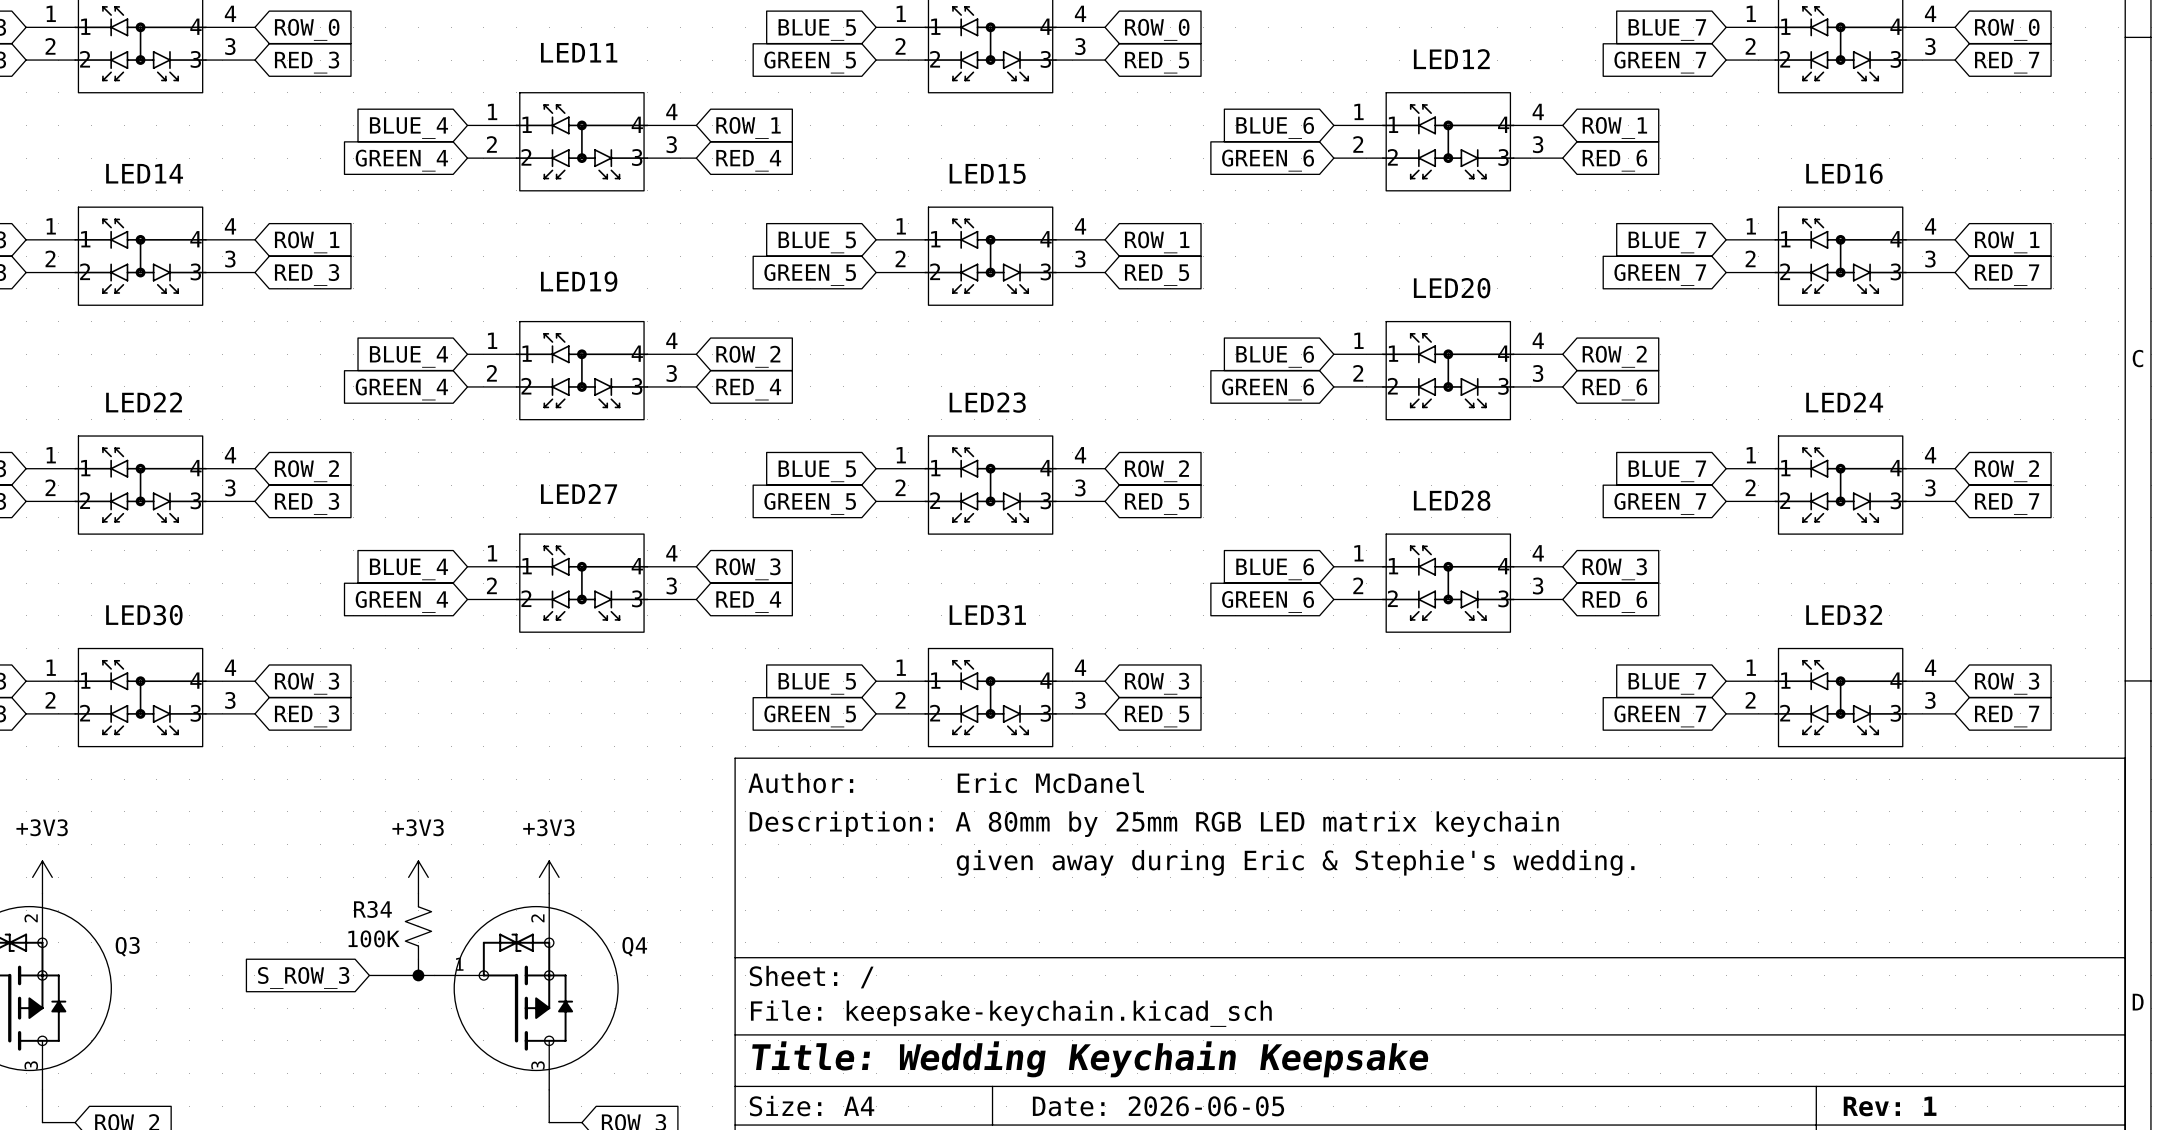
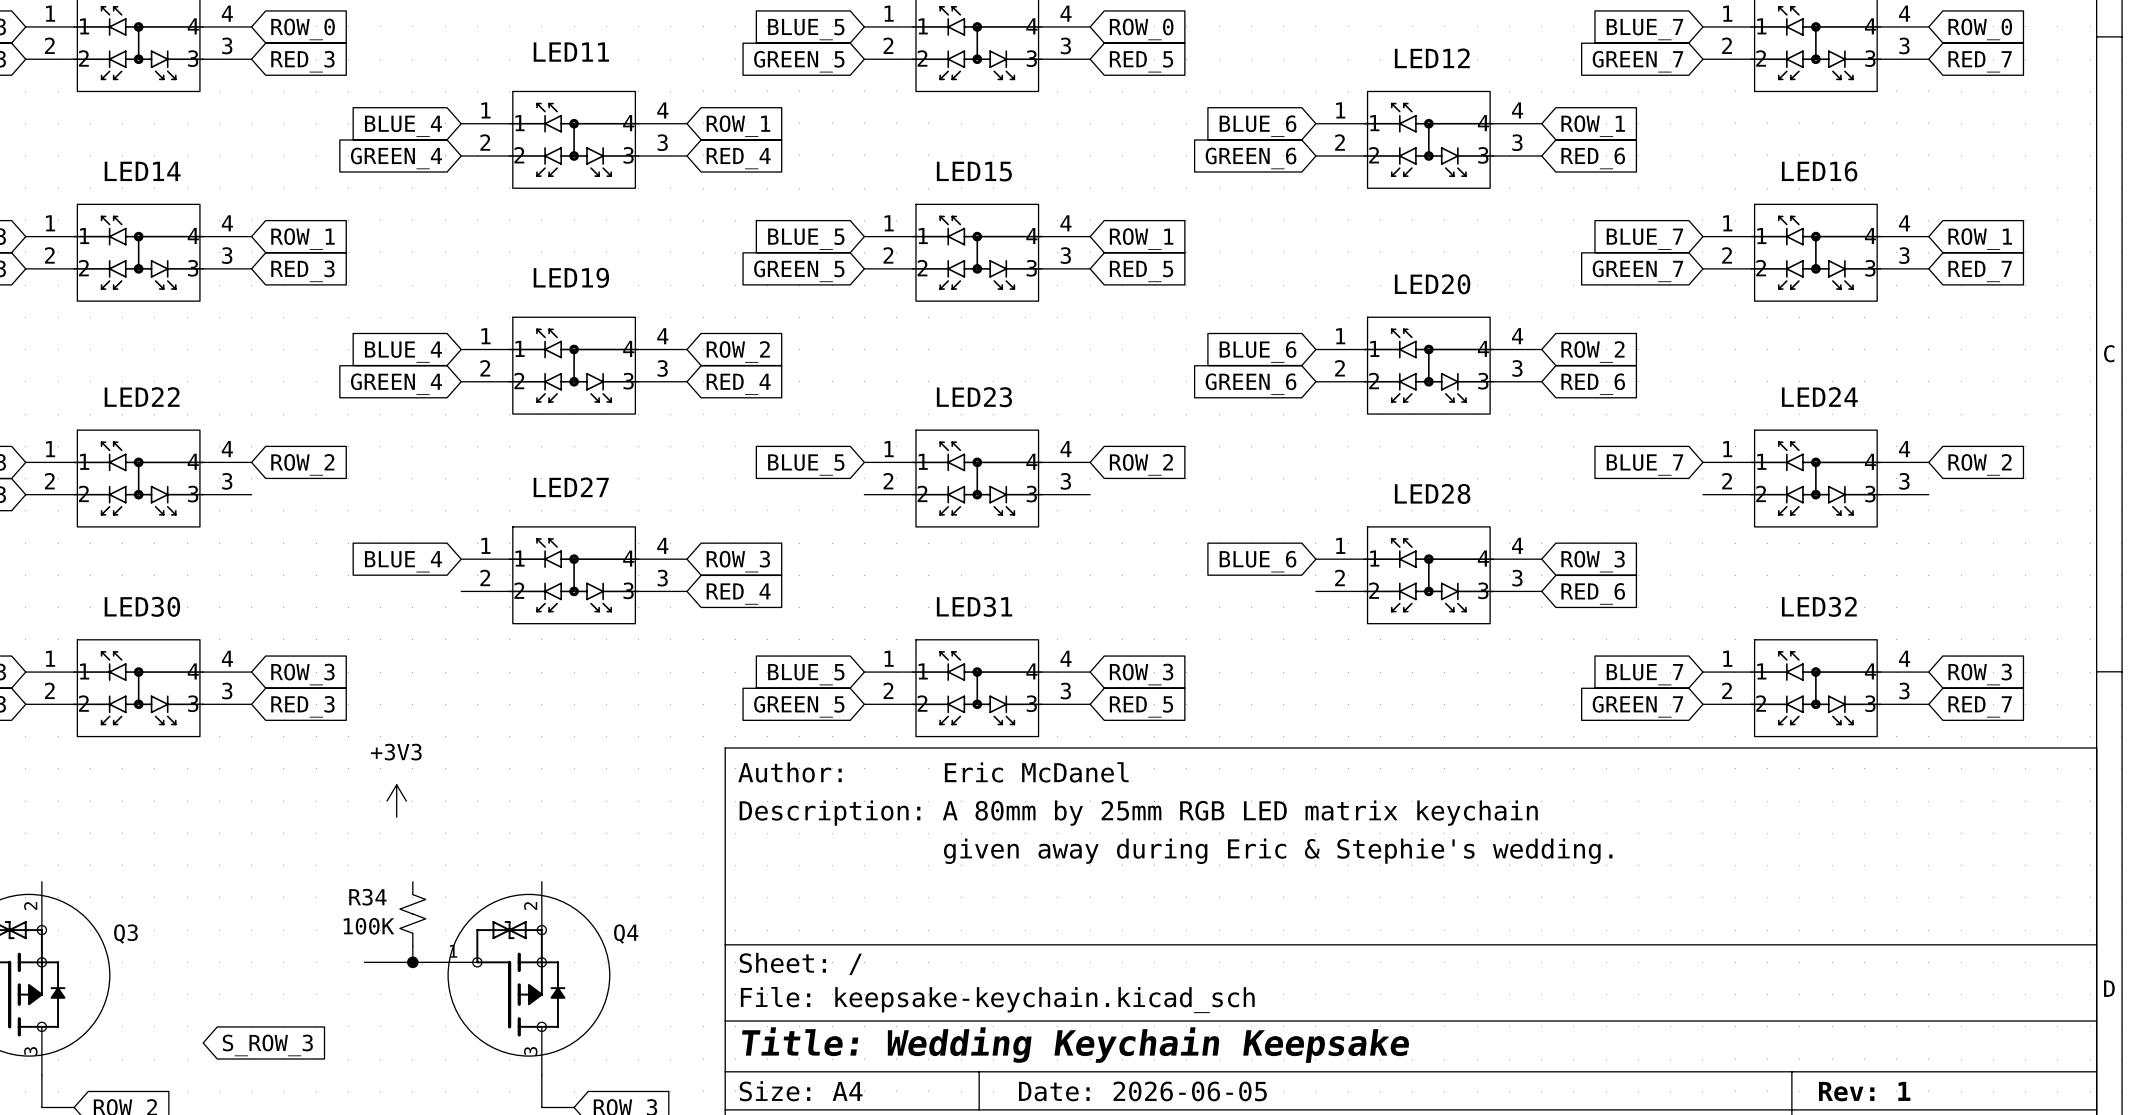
global label: RED_3 (307, 503) -> none
global label: GREEN_5 (810, 503) -> none
global label: GREEN_7 (1660, 503) -> none
global label: RED_5 (1157, 504) -> none
global label: RED_7 (2007, 504) -> none
global label: GREEN_4 (401, 601) -> none
global label: GREEN_6 (1268, 601) -> none
power symbol: +3V3 (42, 877) -> none
power symbol position: +3V3 (418, 877) -> +3V3 (396, 801)
power symbol: +3V3 (549, 877) -> none
global label rotation: 0° (303, 977) -> 180° (267, 1045)

